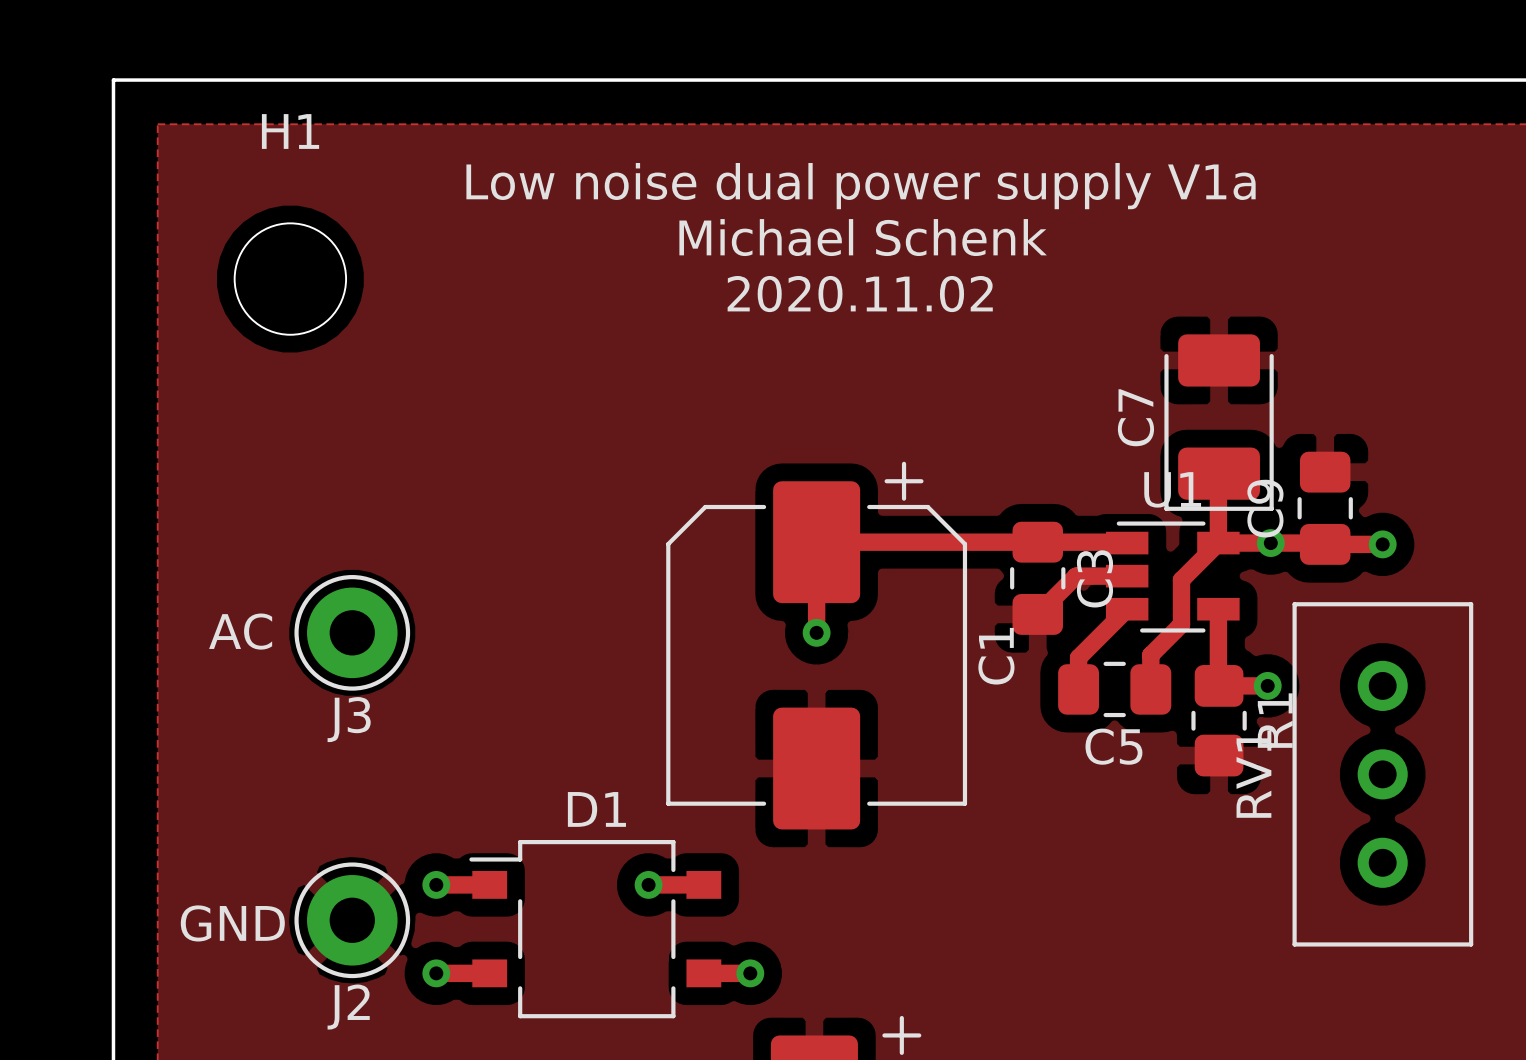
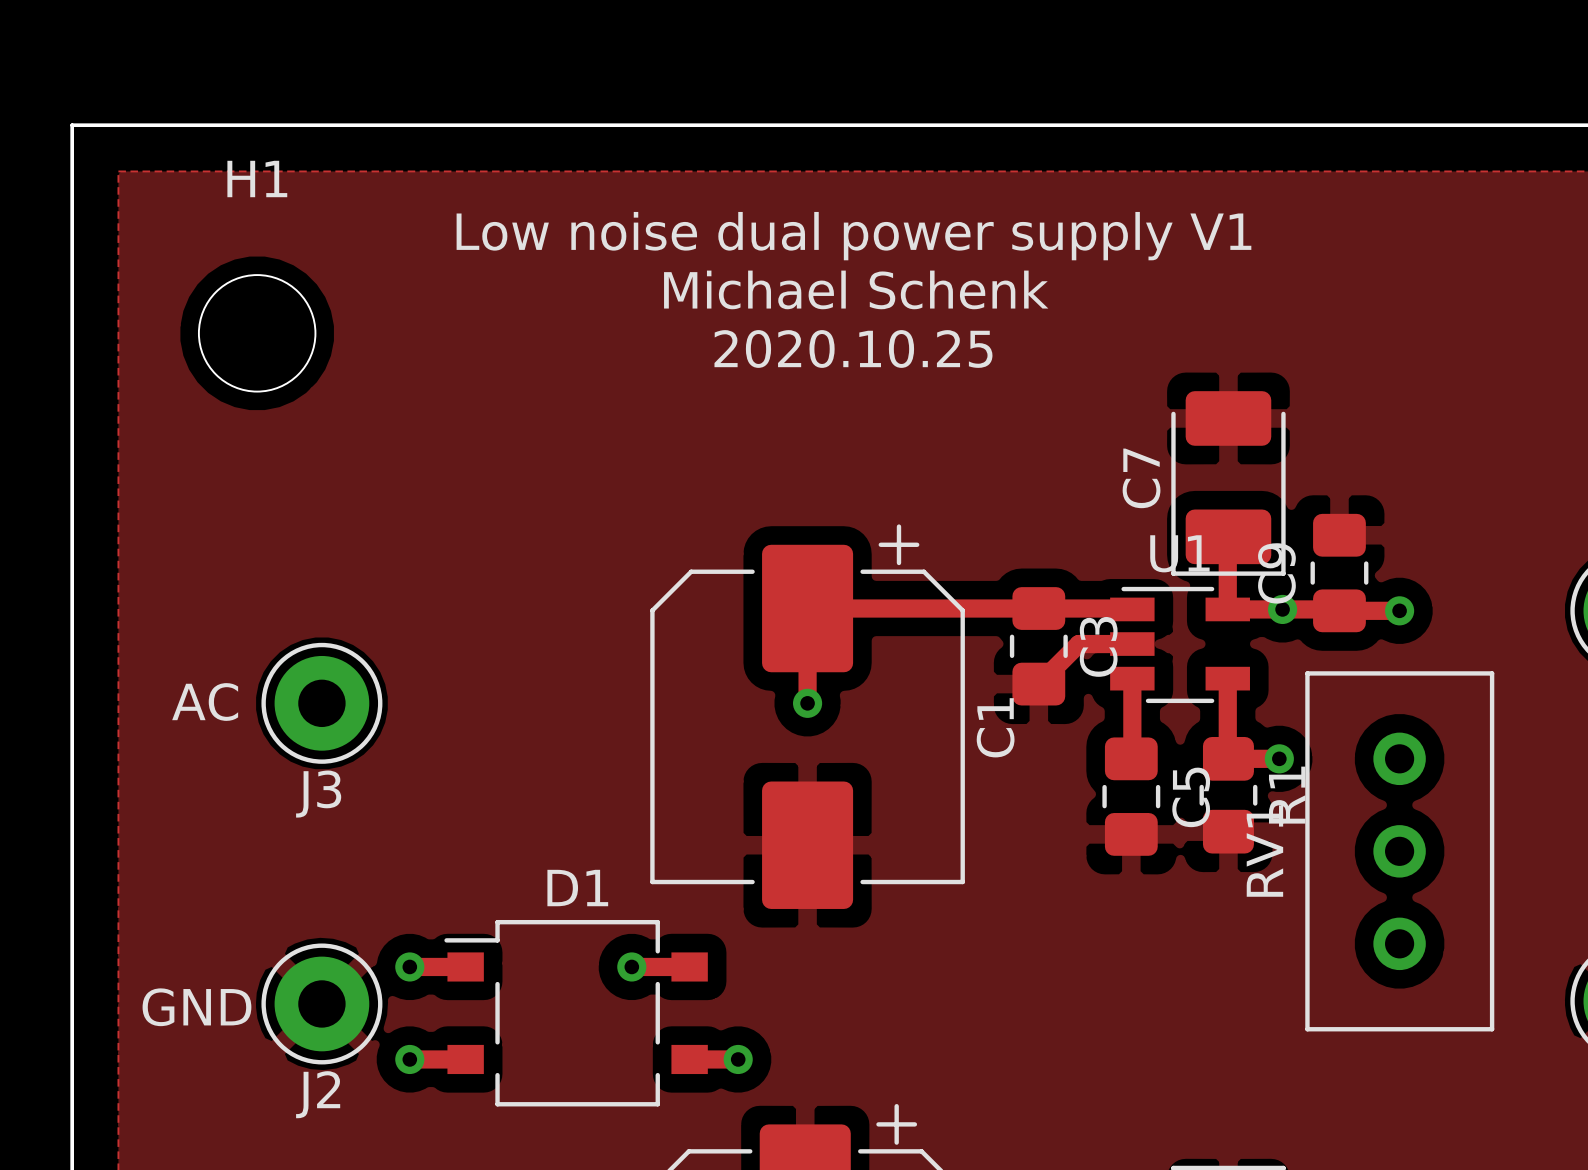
text: Low noise dual power supply V1a (861, 186) -> Low noise dual power supply V1 (853, 236)
text: 2020.11.02 (860, 294) -> 2020.10.25 (853, 348)
track: (1218, 543) (1181, 579) (1181, 624) (1150, 655) (1150, 689) -> none
track: (1127, 609) (1078, 657) (1078, 689) -> (1132, 678) (1131, 758)
C5 rotation: 0° (1114, 689) -> 90° clockwise (1131, 796)
C5 name position: C5 (1113, 746) -> C5 (1191, 797)

